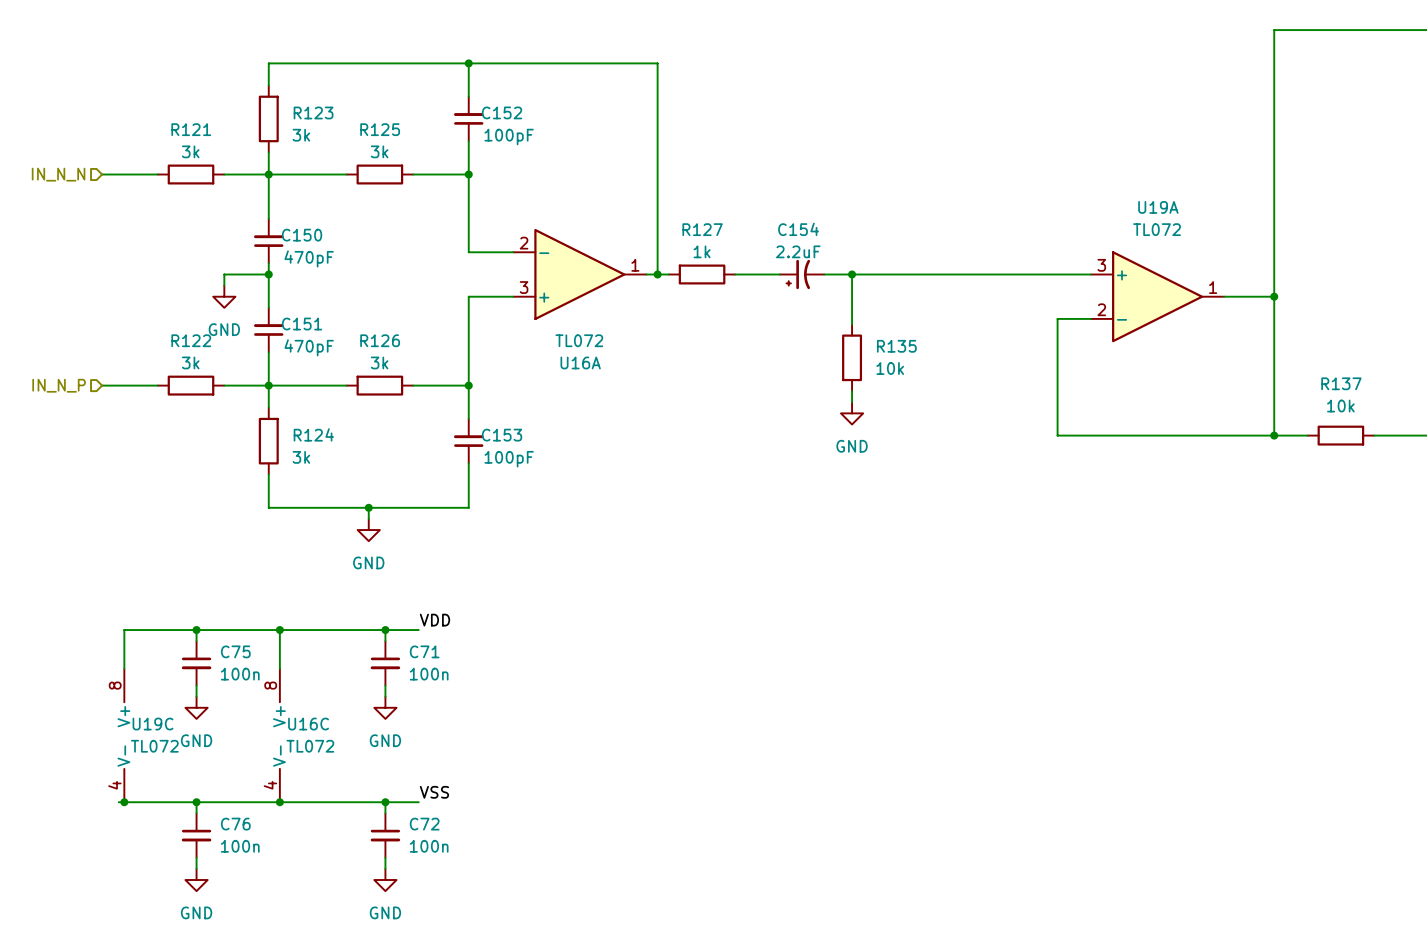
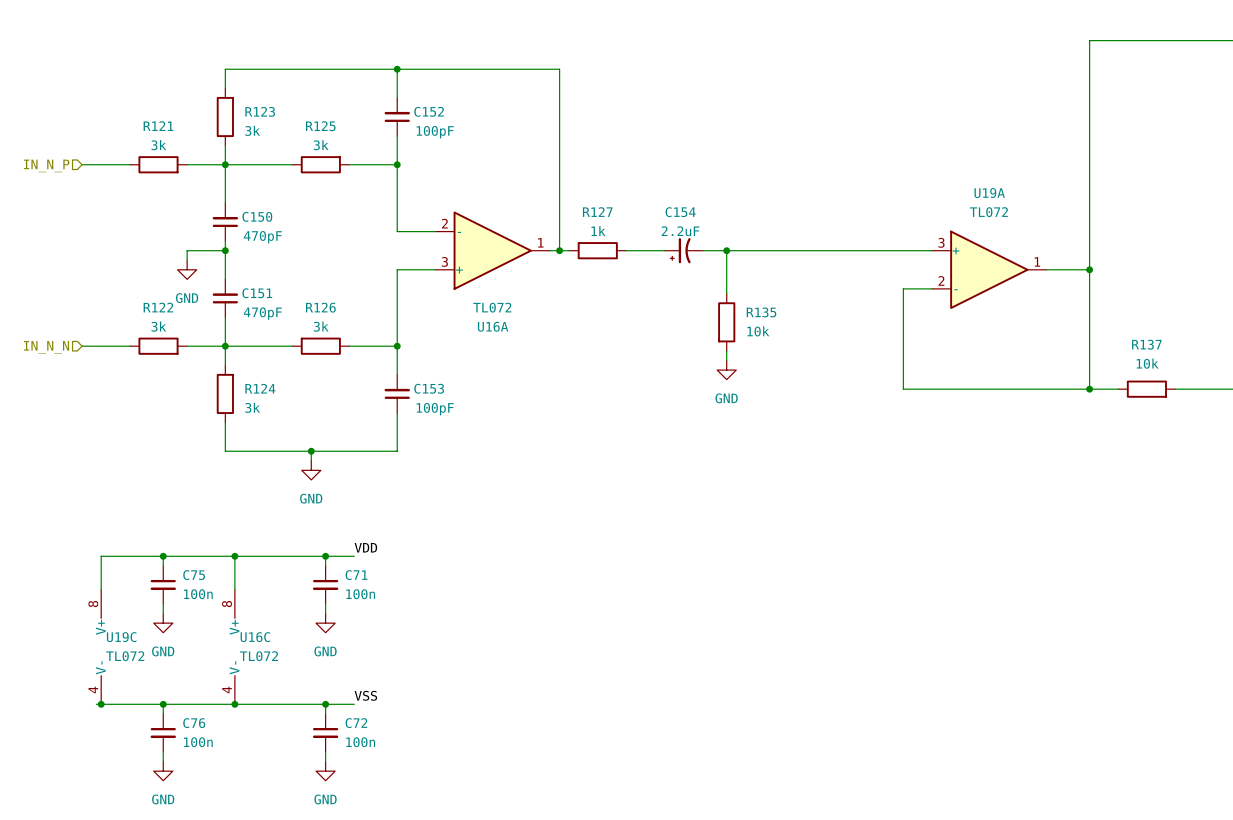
hierarchical label: IN_N_N (58, 174) -> IN_N_P (46, 165)
hierarchical label: IN_N_P (59, 385) -> IN_N_N (46, 347)

